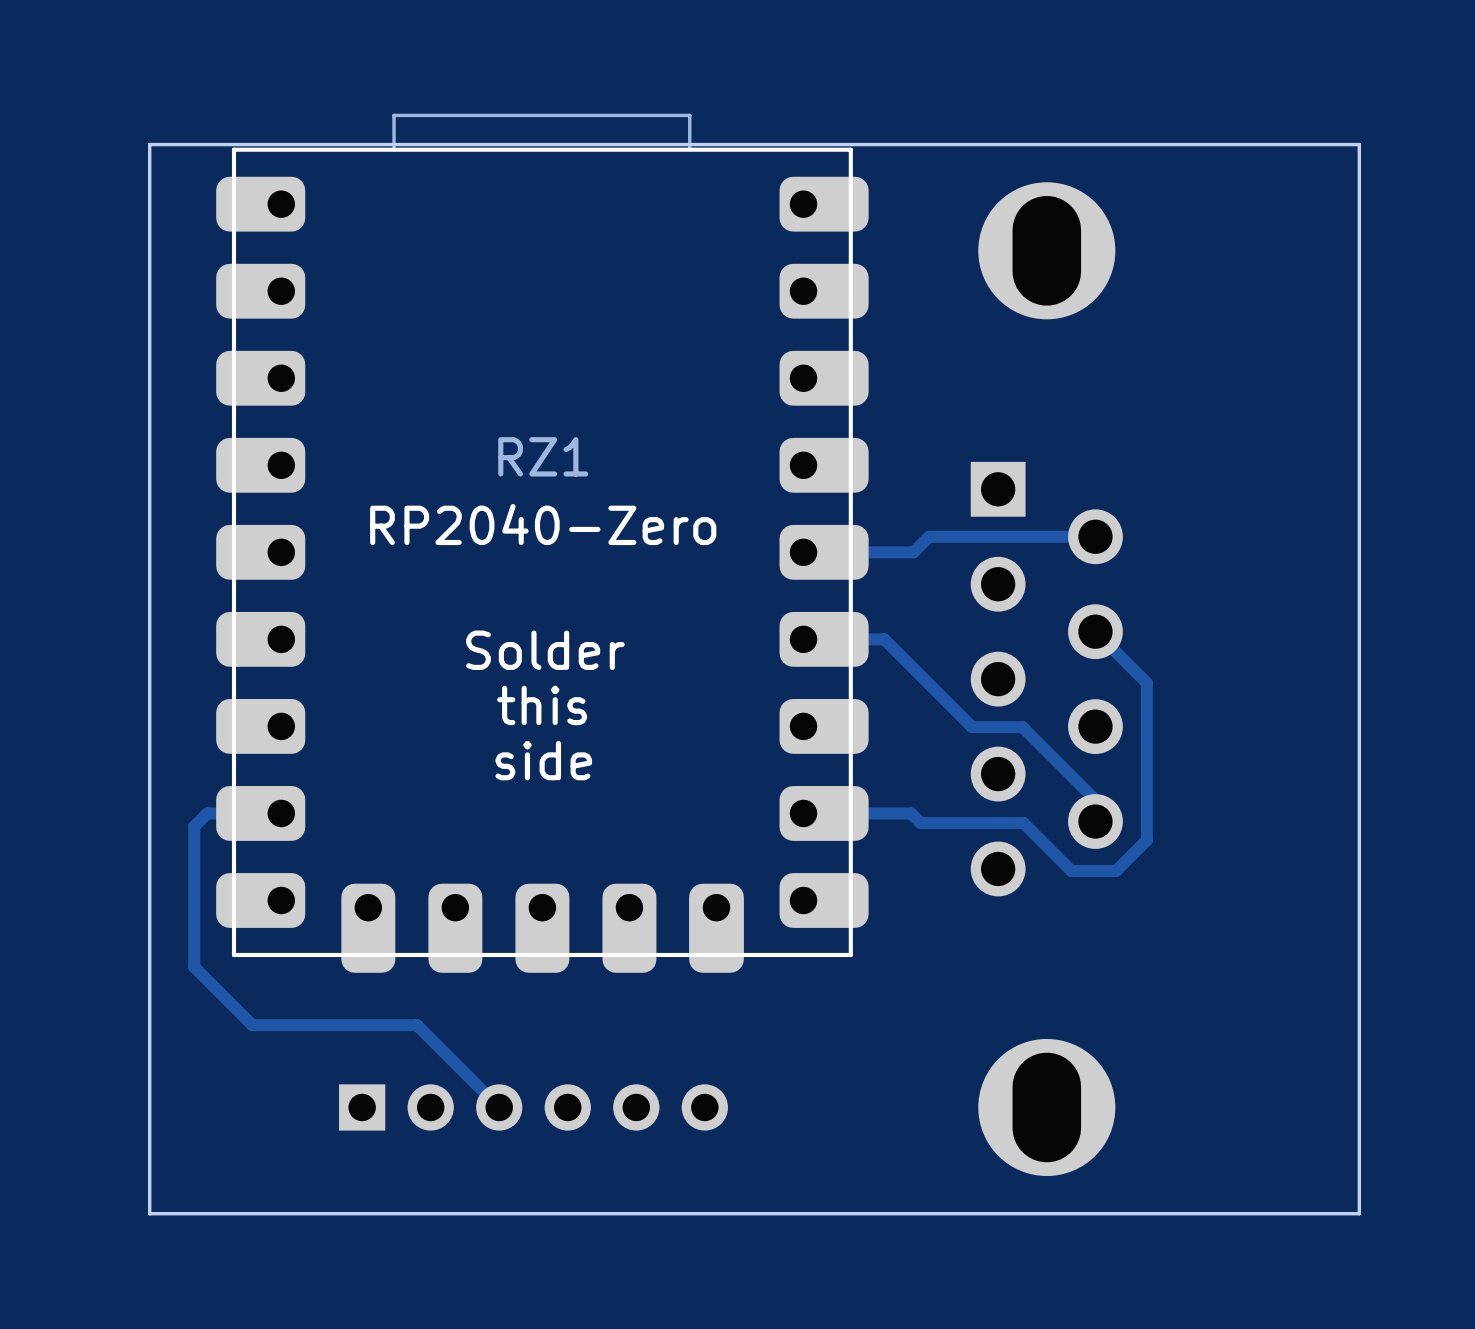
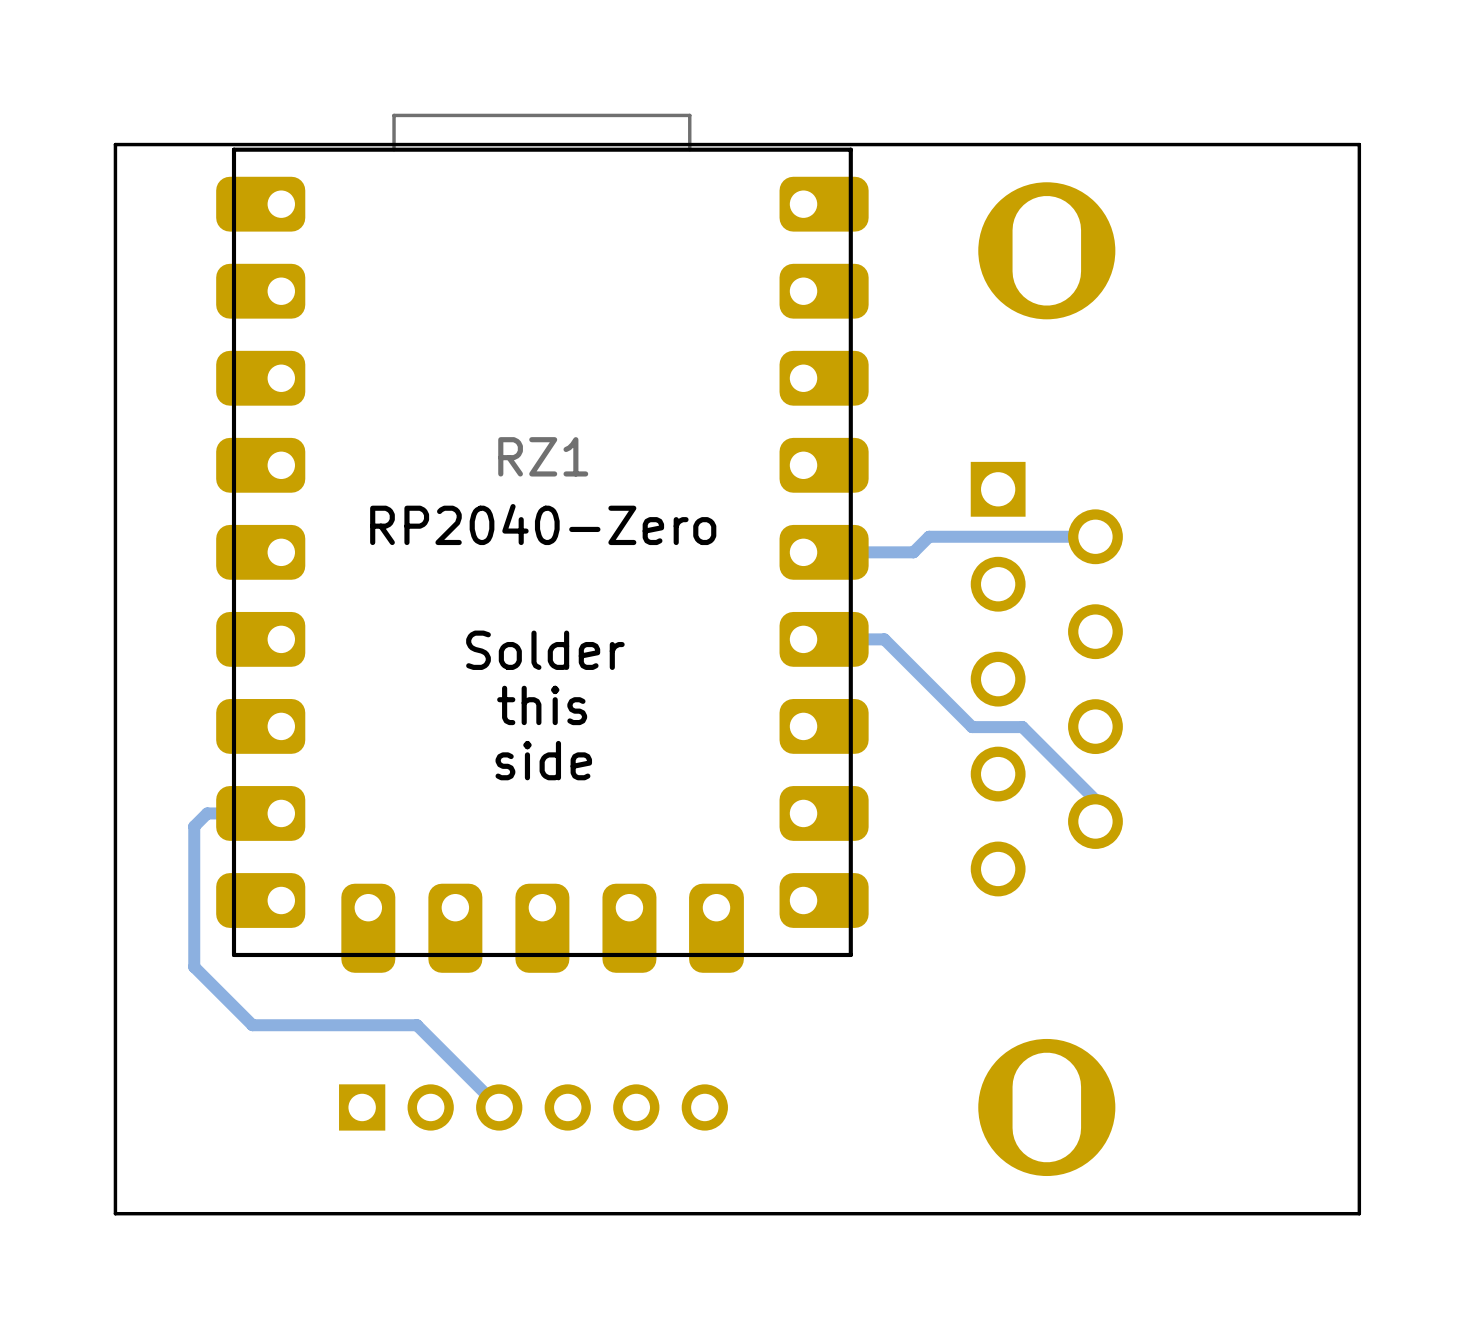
board edge: (149, 144) (149, 1213) -> (149, 144) (115, 144) (115, 1213) (149, 1213)
track: (1095, 631) (1146, 683) (1146, 840) (1116, 871) (1071, 871) (1023, 823) (920, 823) (911, 813) (803, 813) -> none

